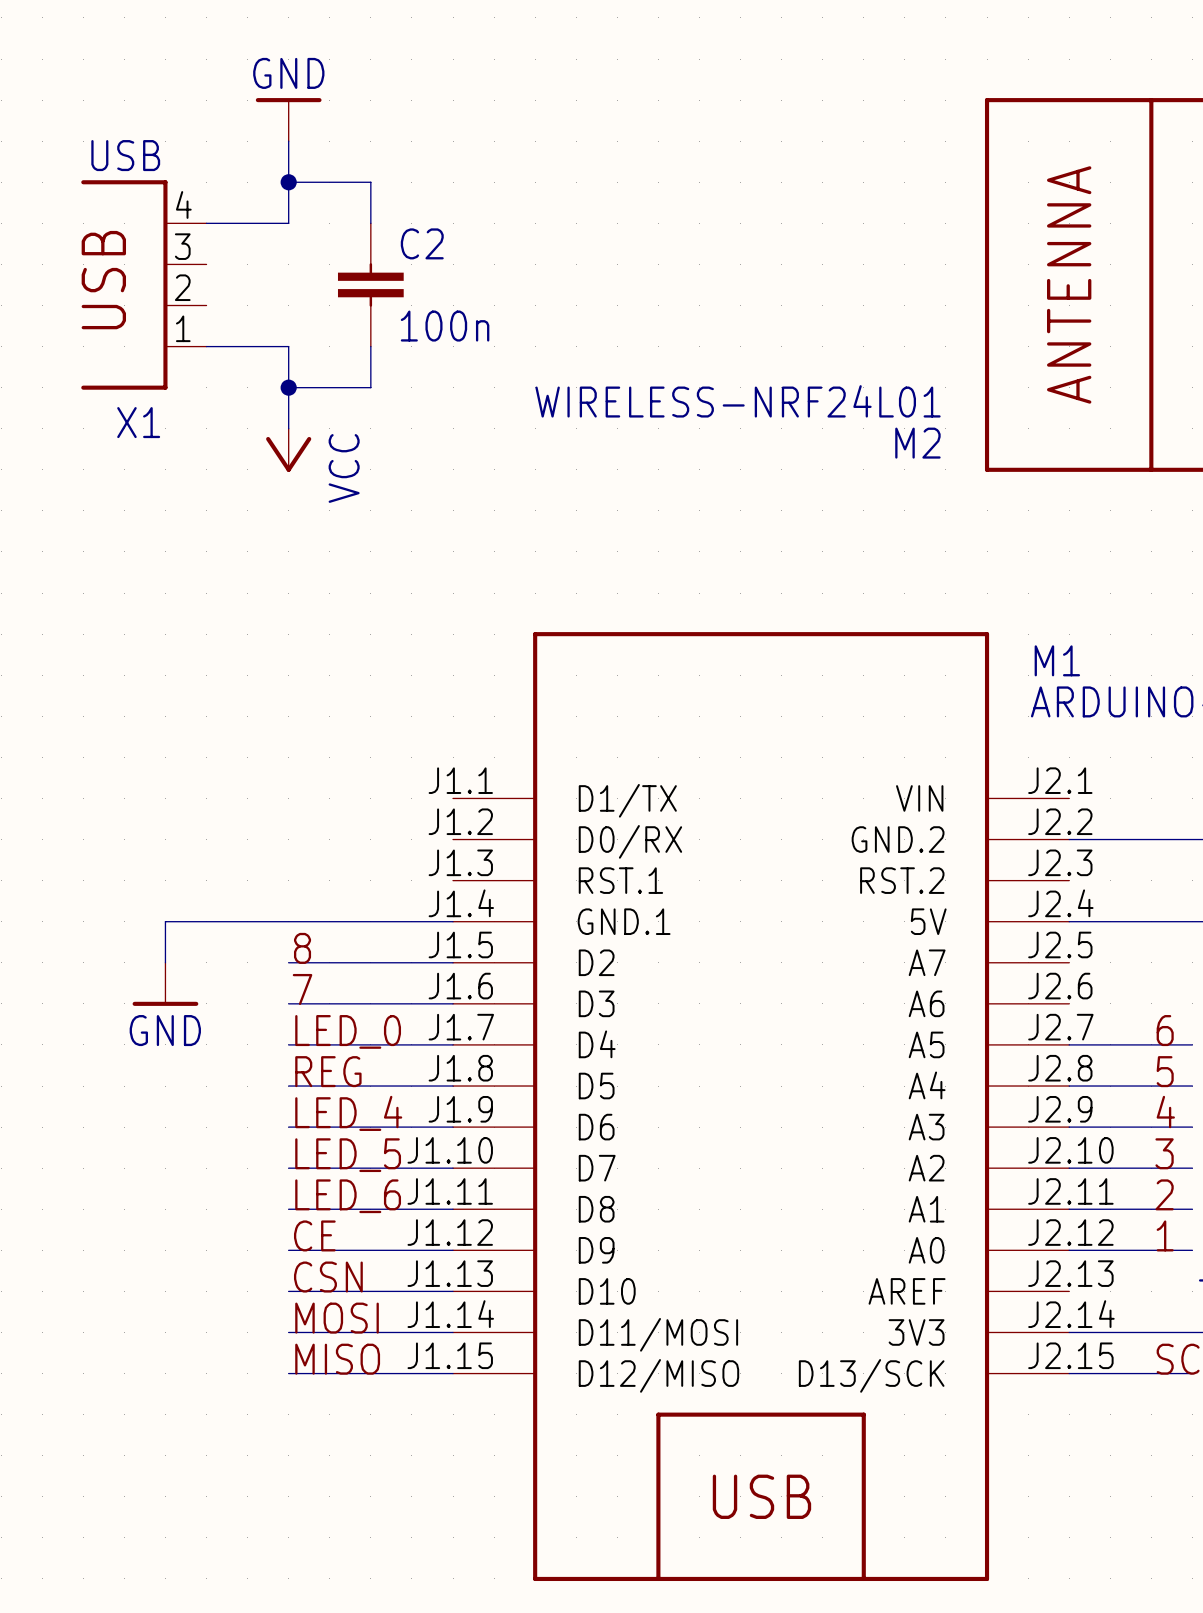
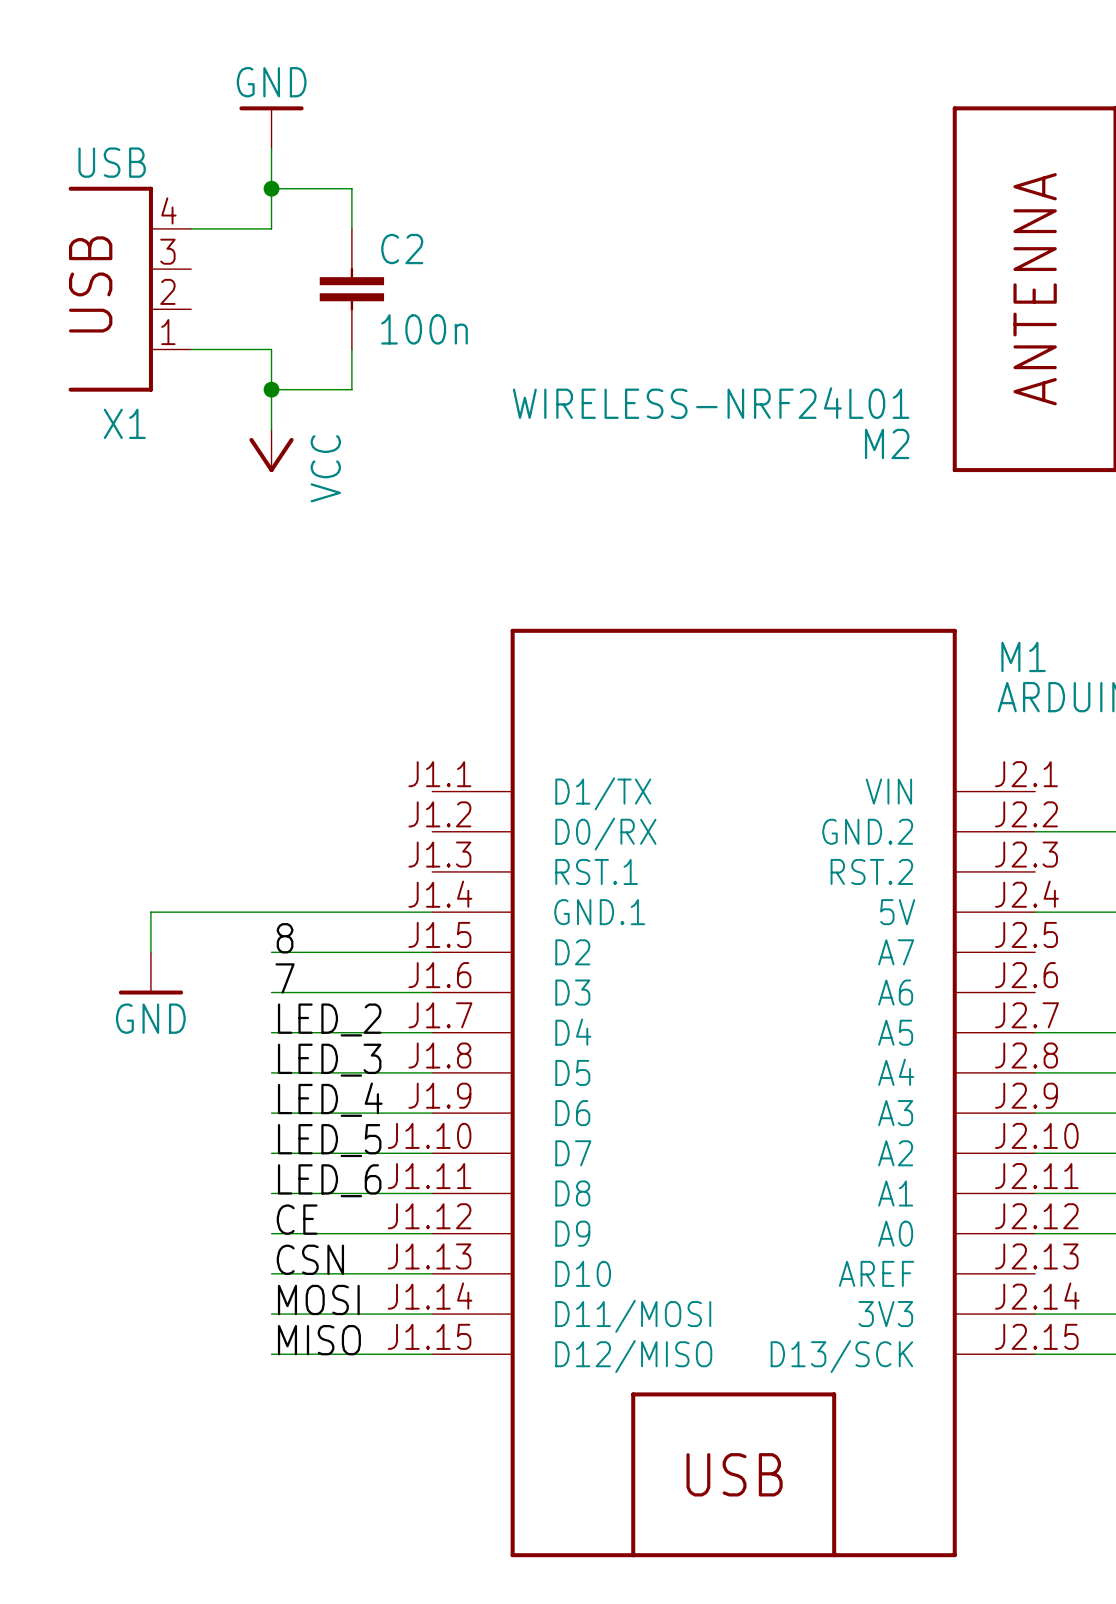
label: LED_0 (348, 1031) -> LED_2 (329, 1019)
label: REG (328, 1071) -> LED_3 (329, 1060)

